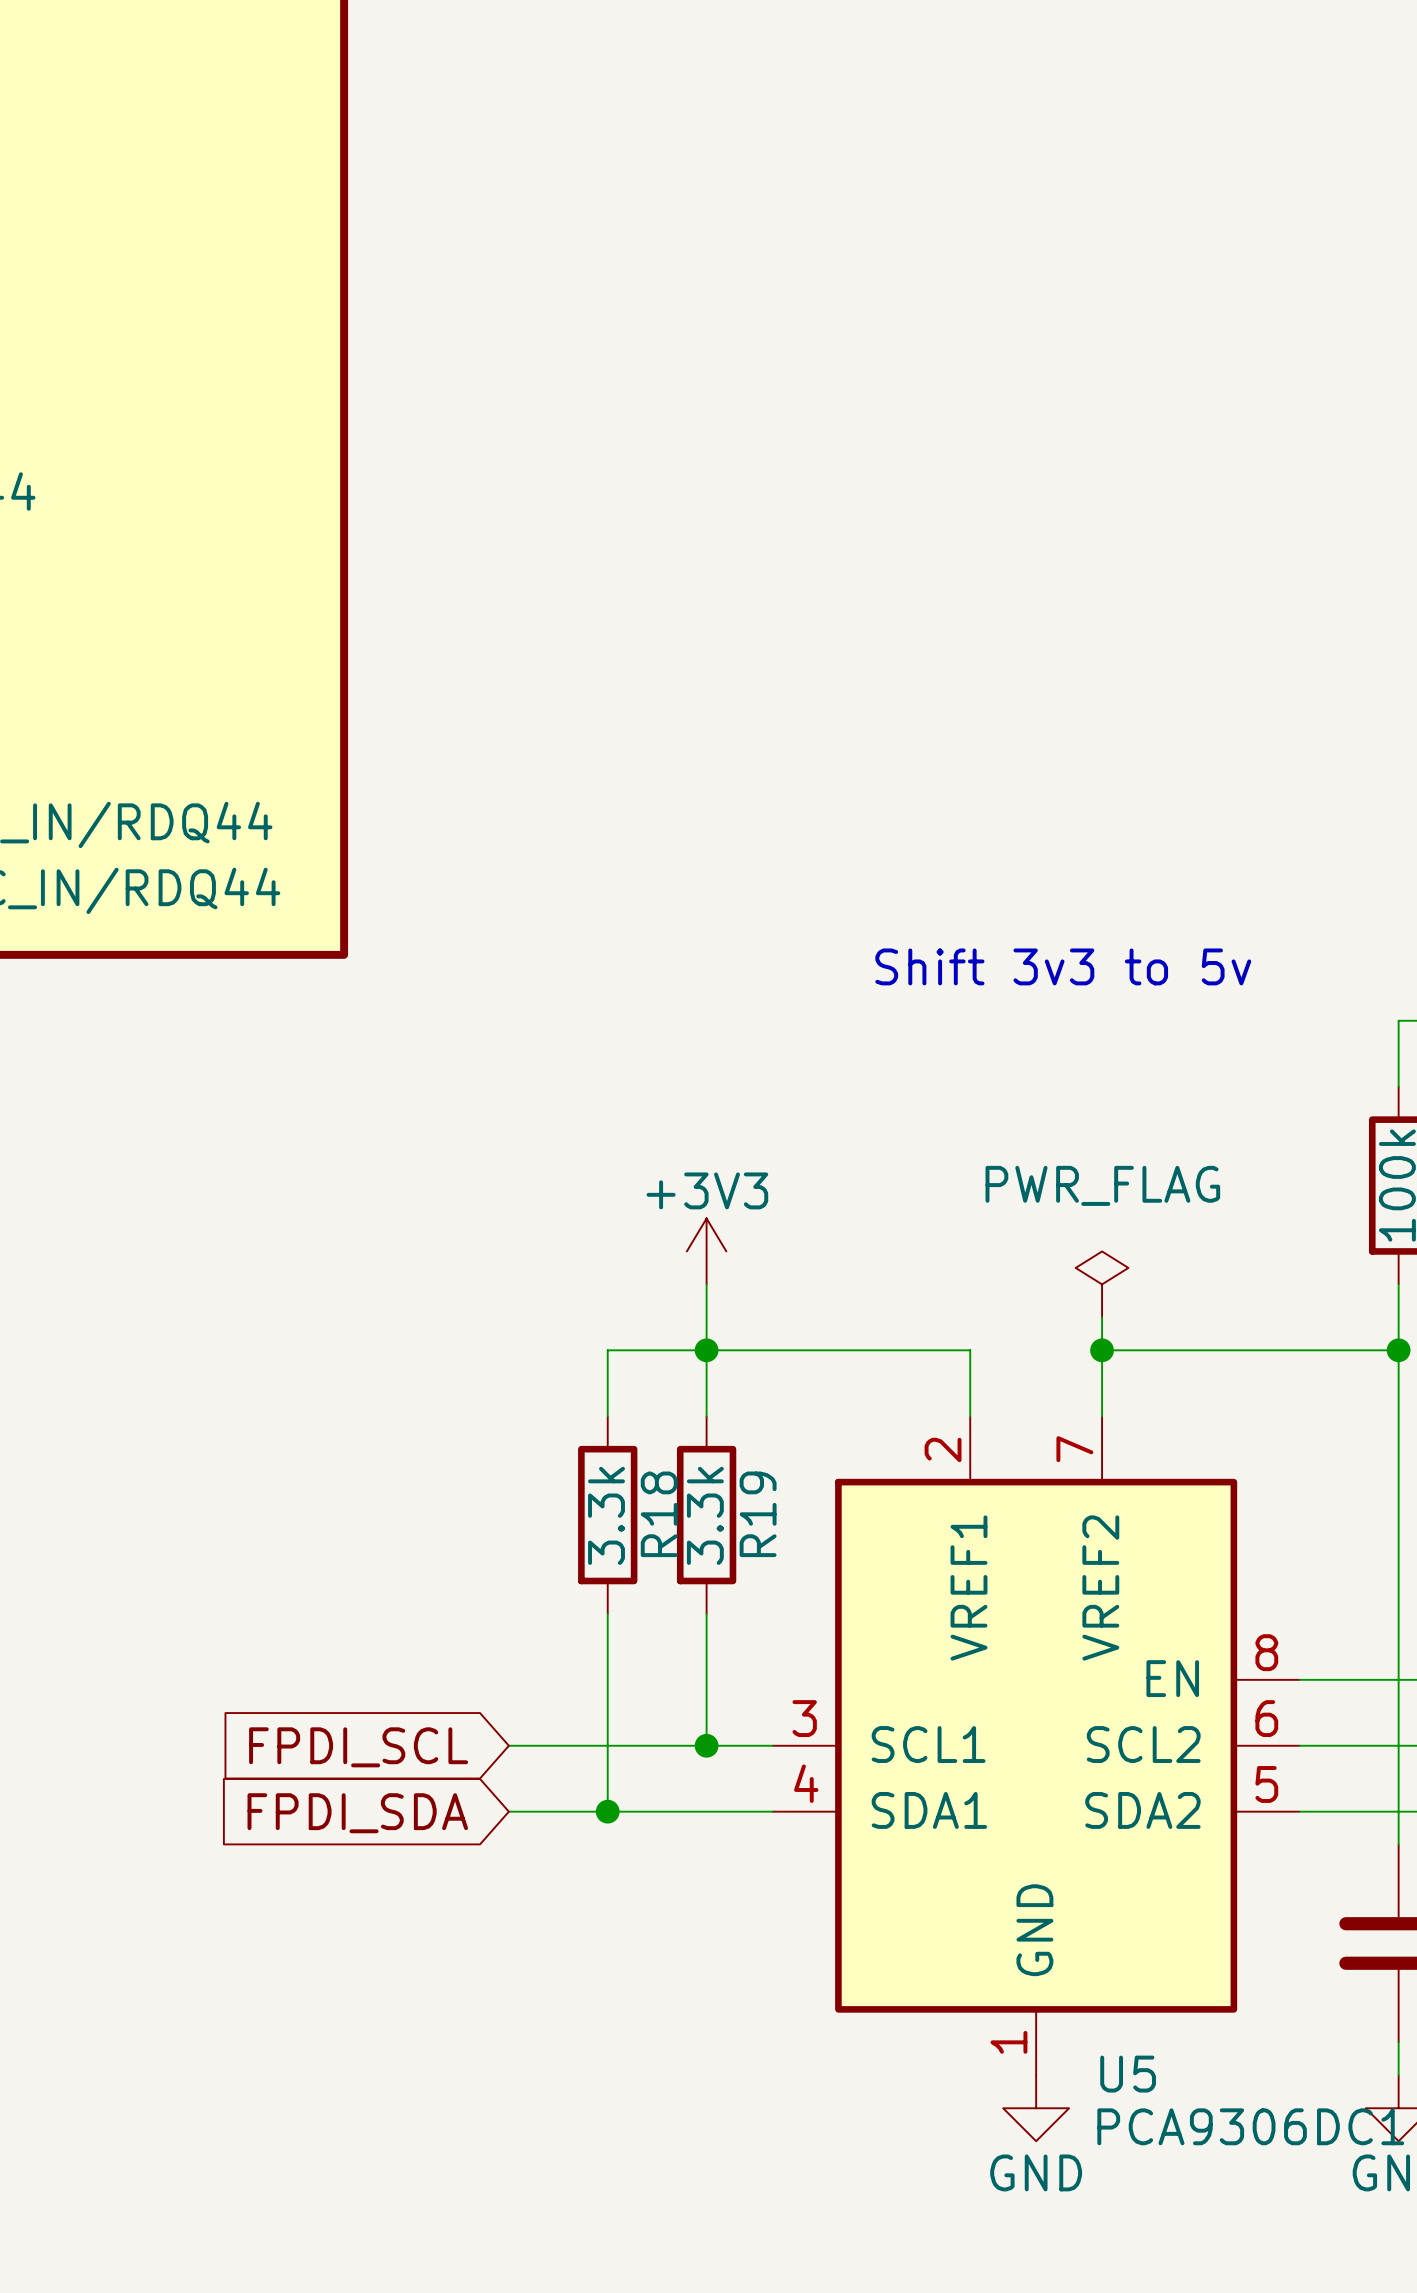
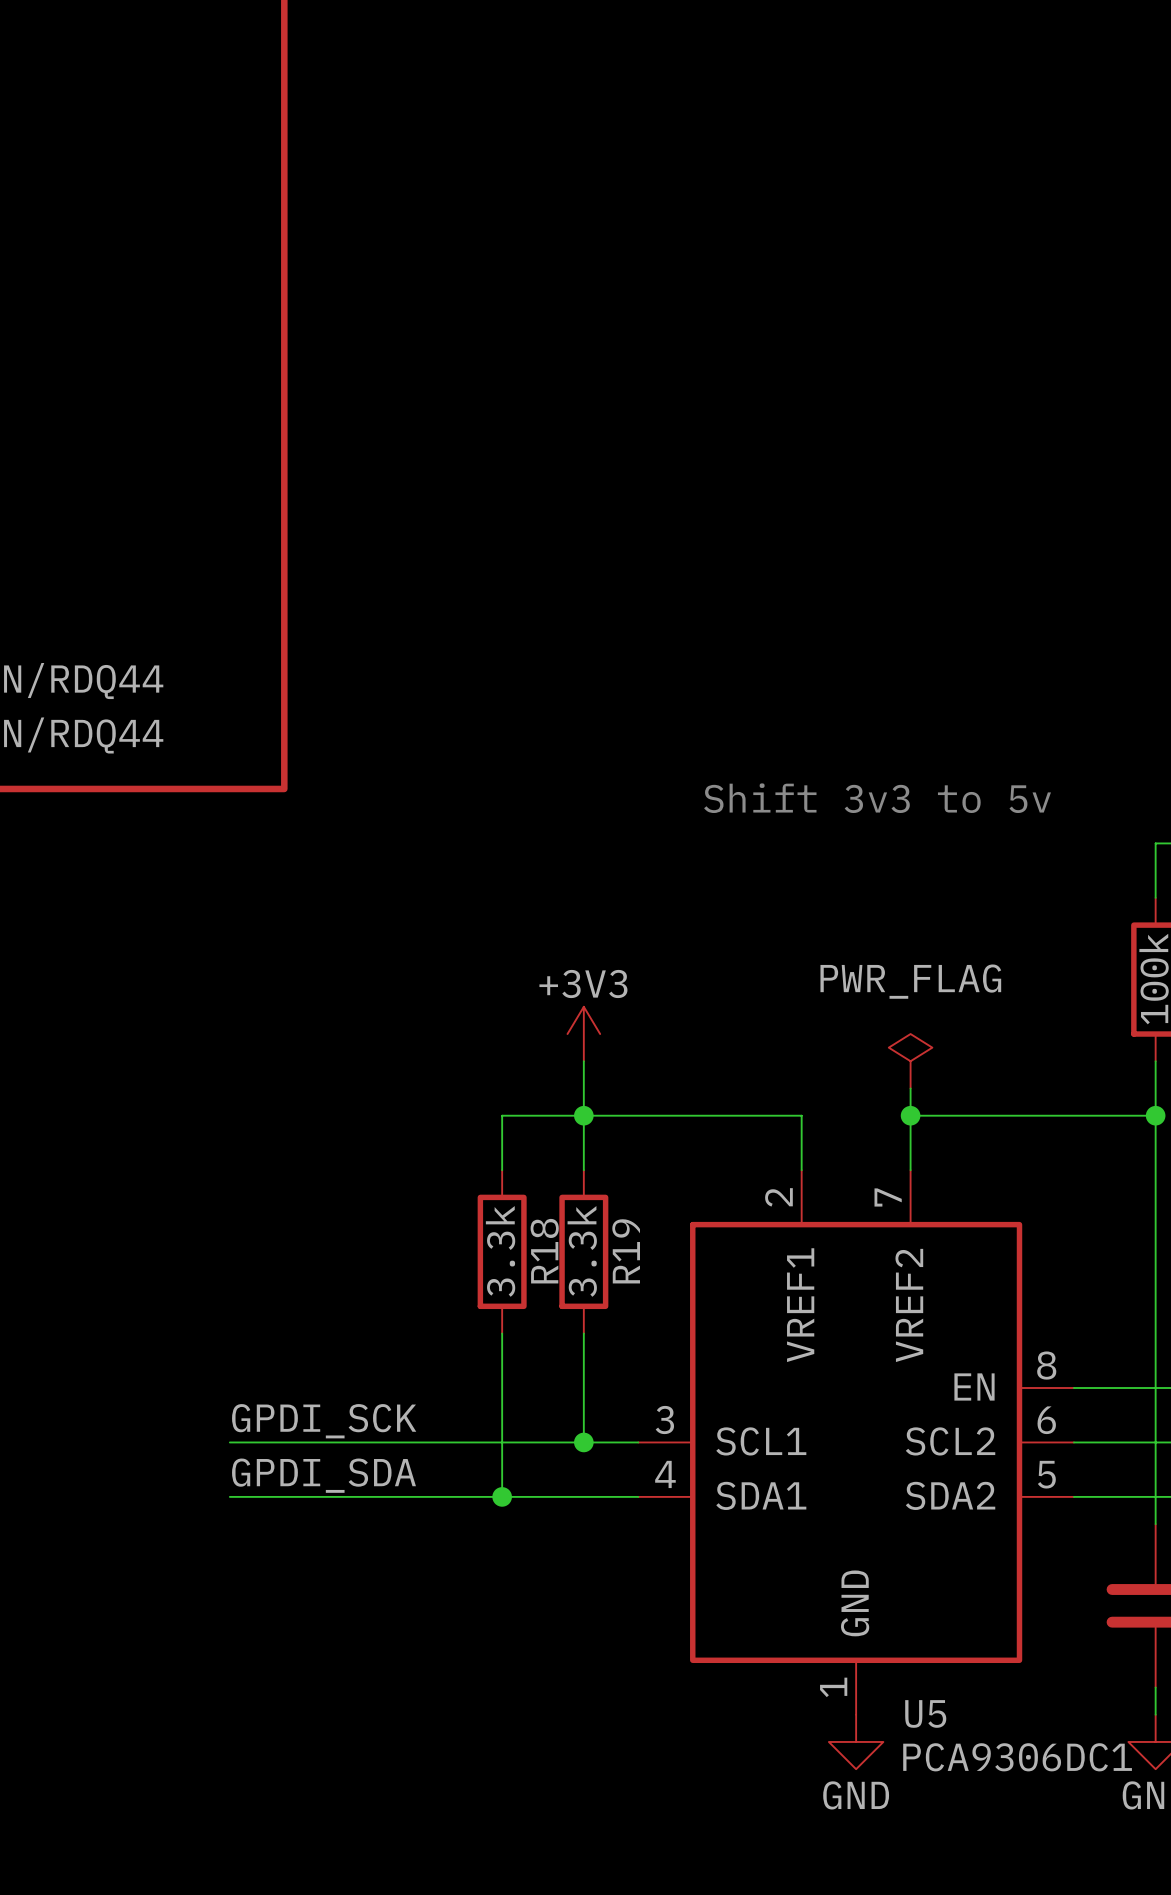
label: none -> GPDI_SCK (324, 1421)
wire: none -> (229, 1442) (420, 1442)
global label: FPDI_SCL (358, 1747) -> none
label: none -> GPDI_SDA (324, 1475)
wire: none -> (229, 1496) (420, 1496)
global label: FPDI_SDA (357, 1813) -> none

